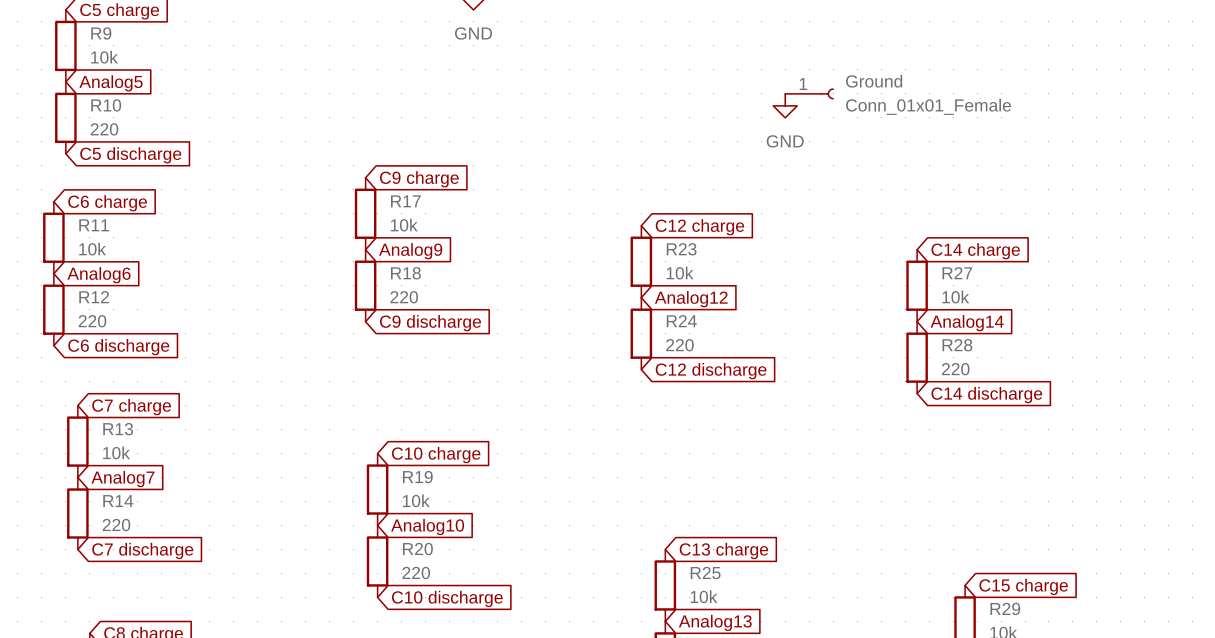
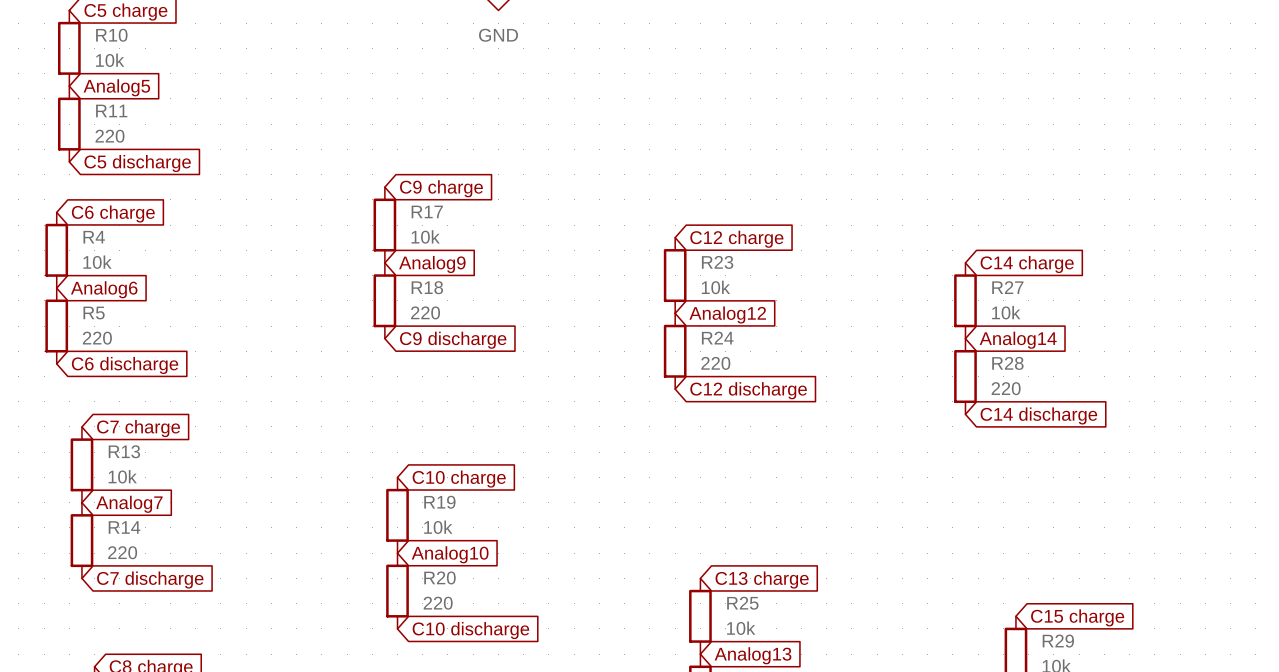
R9 name: R9 (101, 33) -> R10 (111, 35)
Ground: Conn_01x01_Female (809, 93) -> none
R10 name: R10 (106, 105) -> R11 (111, 110)
power symbol: GND (785, 105) -> none
R11 name: R11 (94, 225) -> R4 (94, 237)
R12 name: R12 (94, 297) -> R5 (94, 313)

